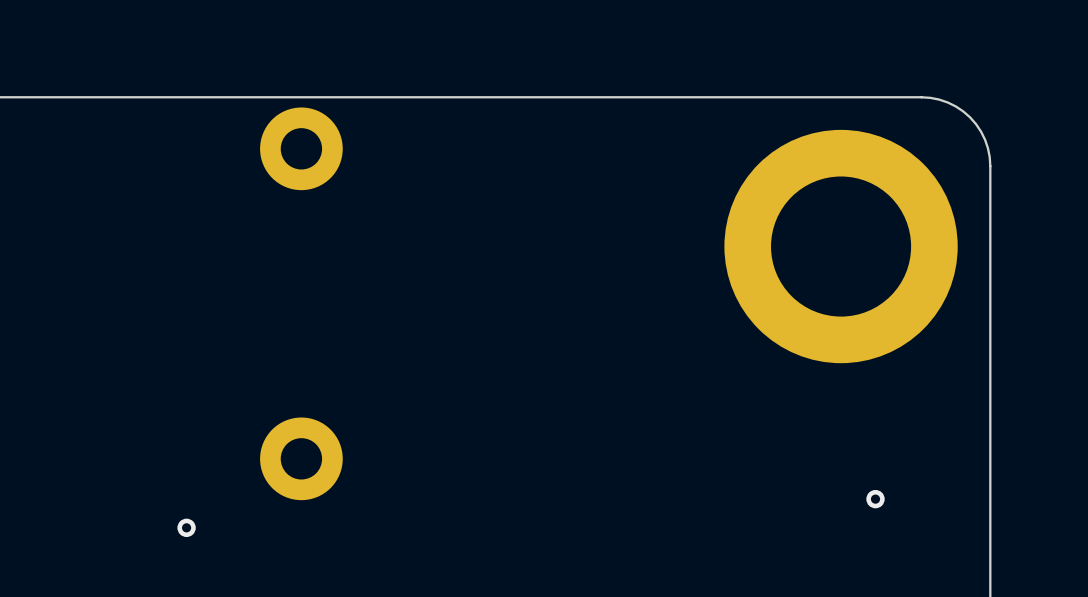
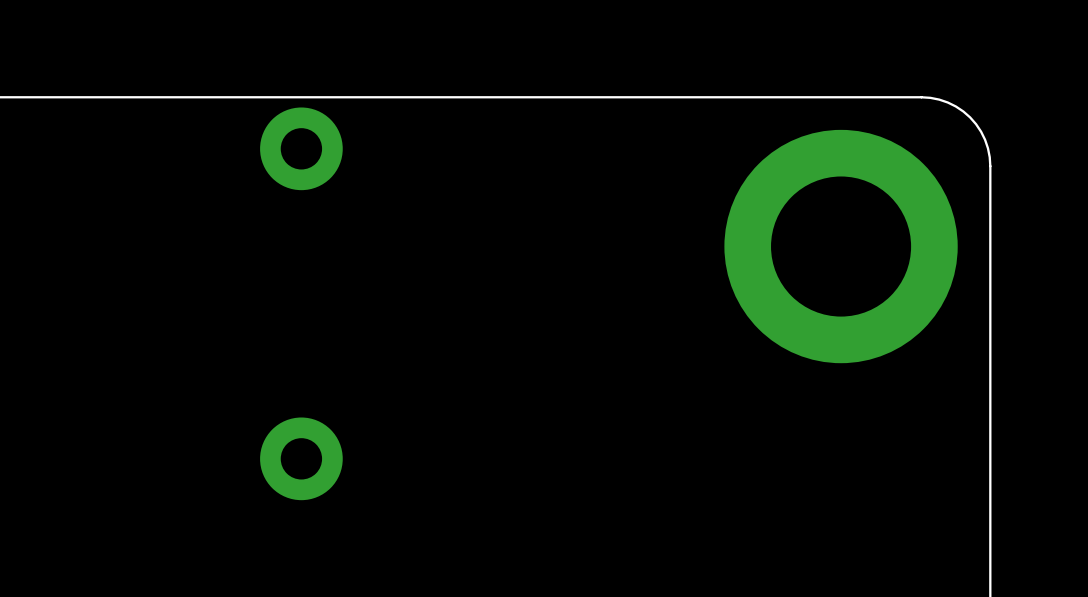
via: (875, 499) -> none
via: (186, 527) -> none

